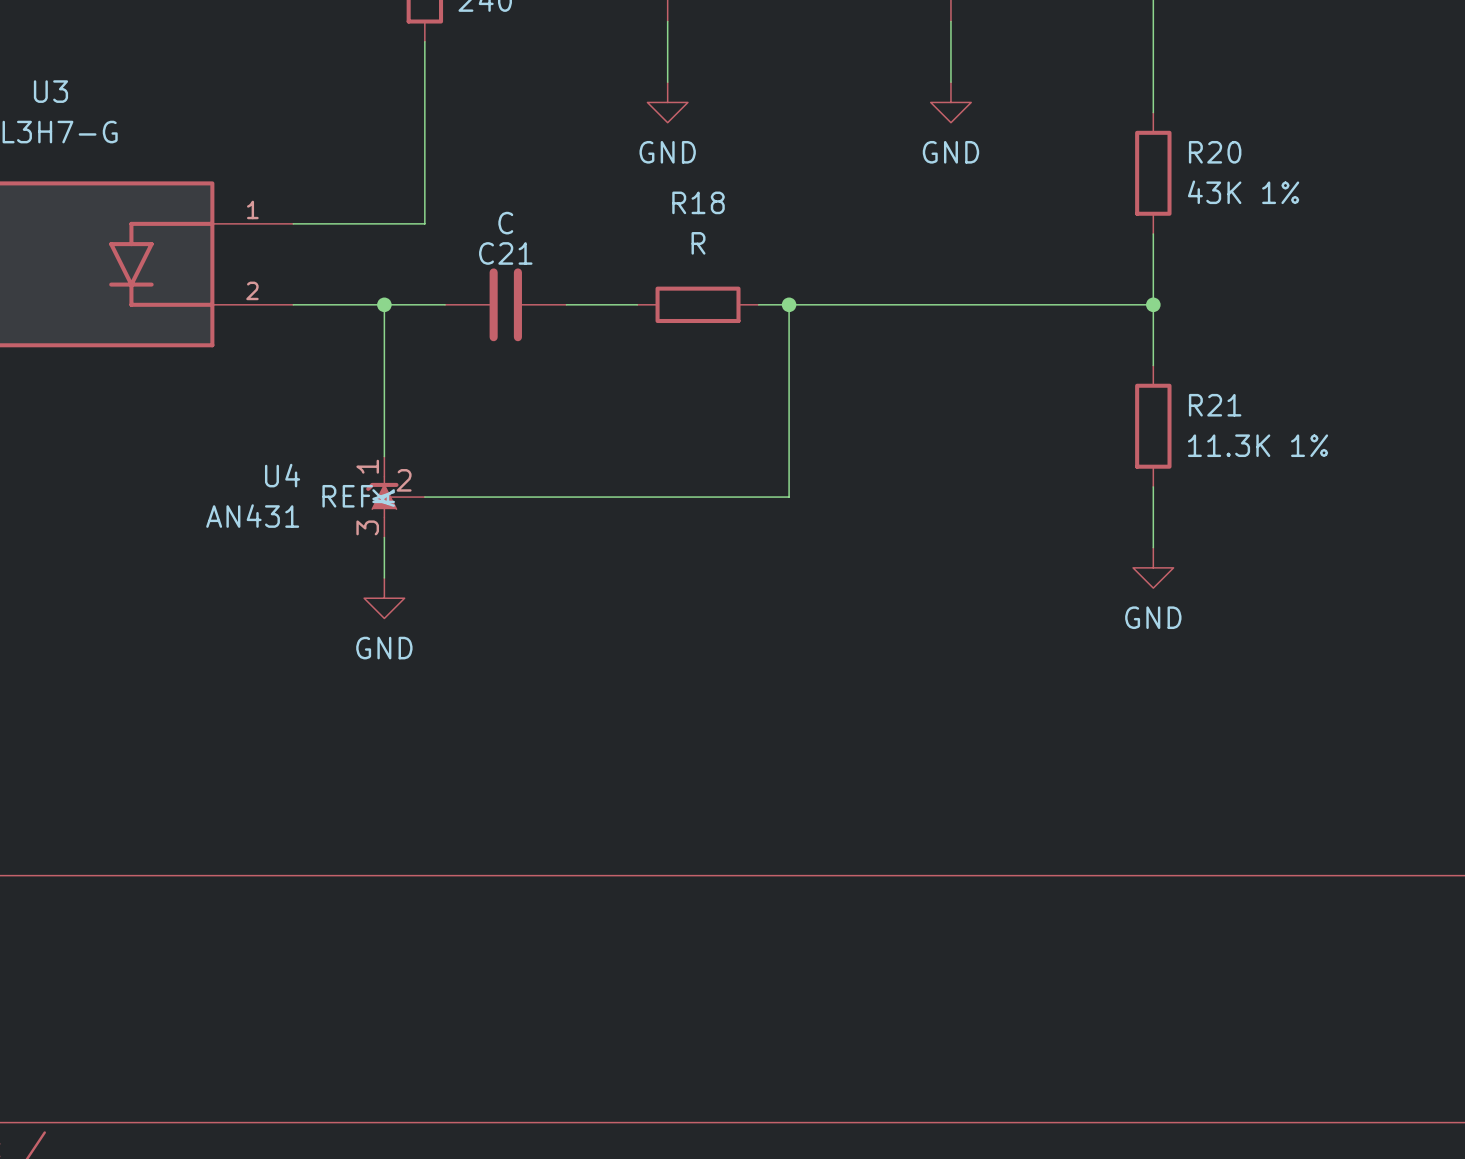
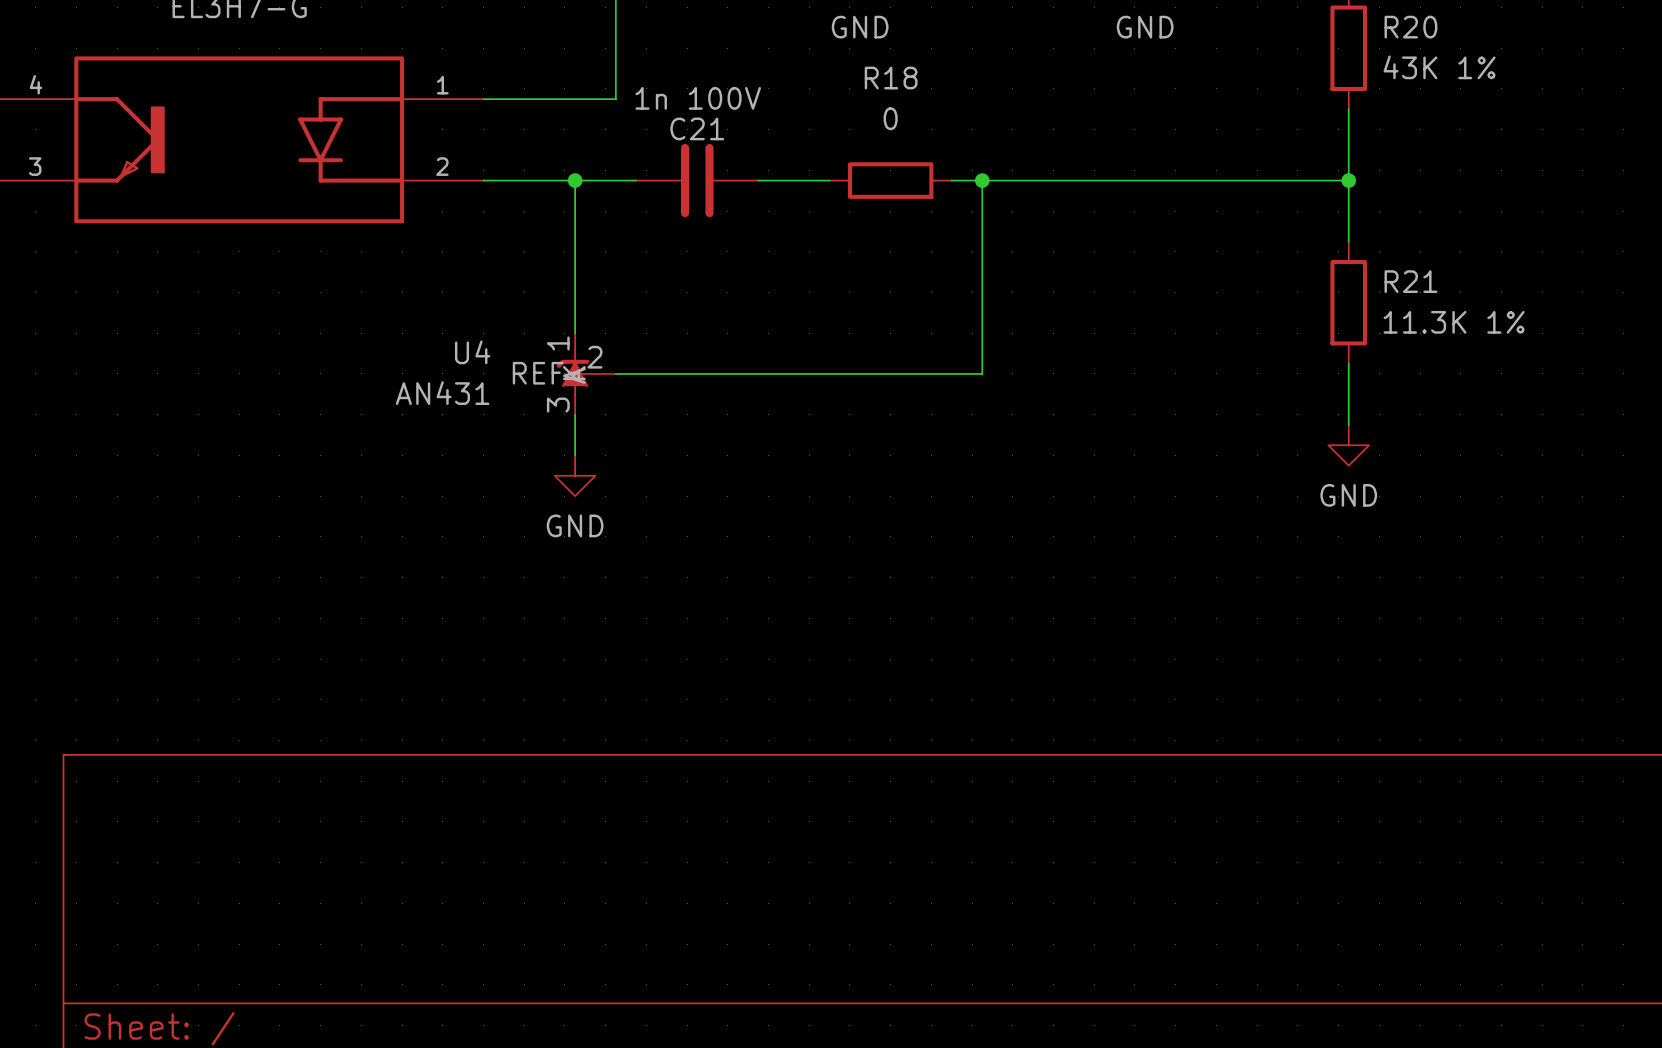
C21 value: C (505, 223) -> 1n 100V (698, 98)
R18 value: R (698, 243) -> 0 (890, 118)

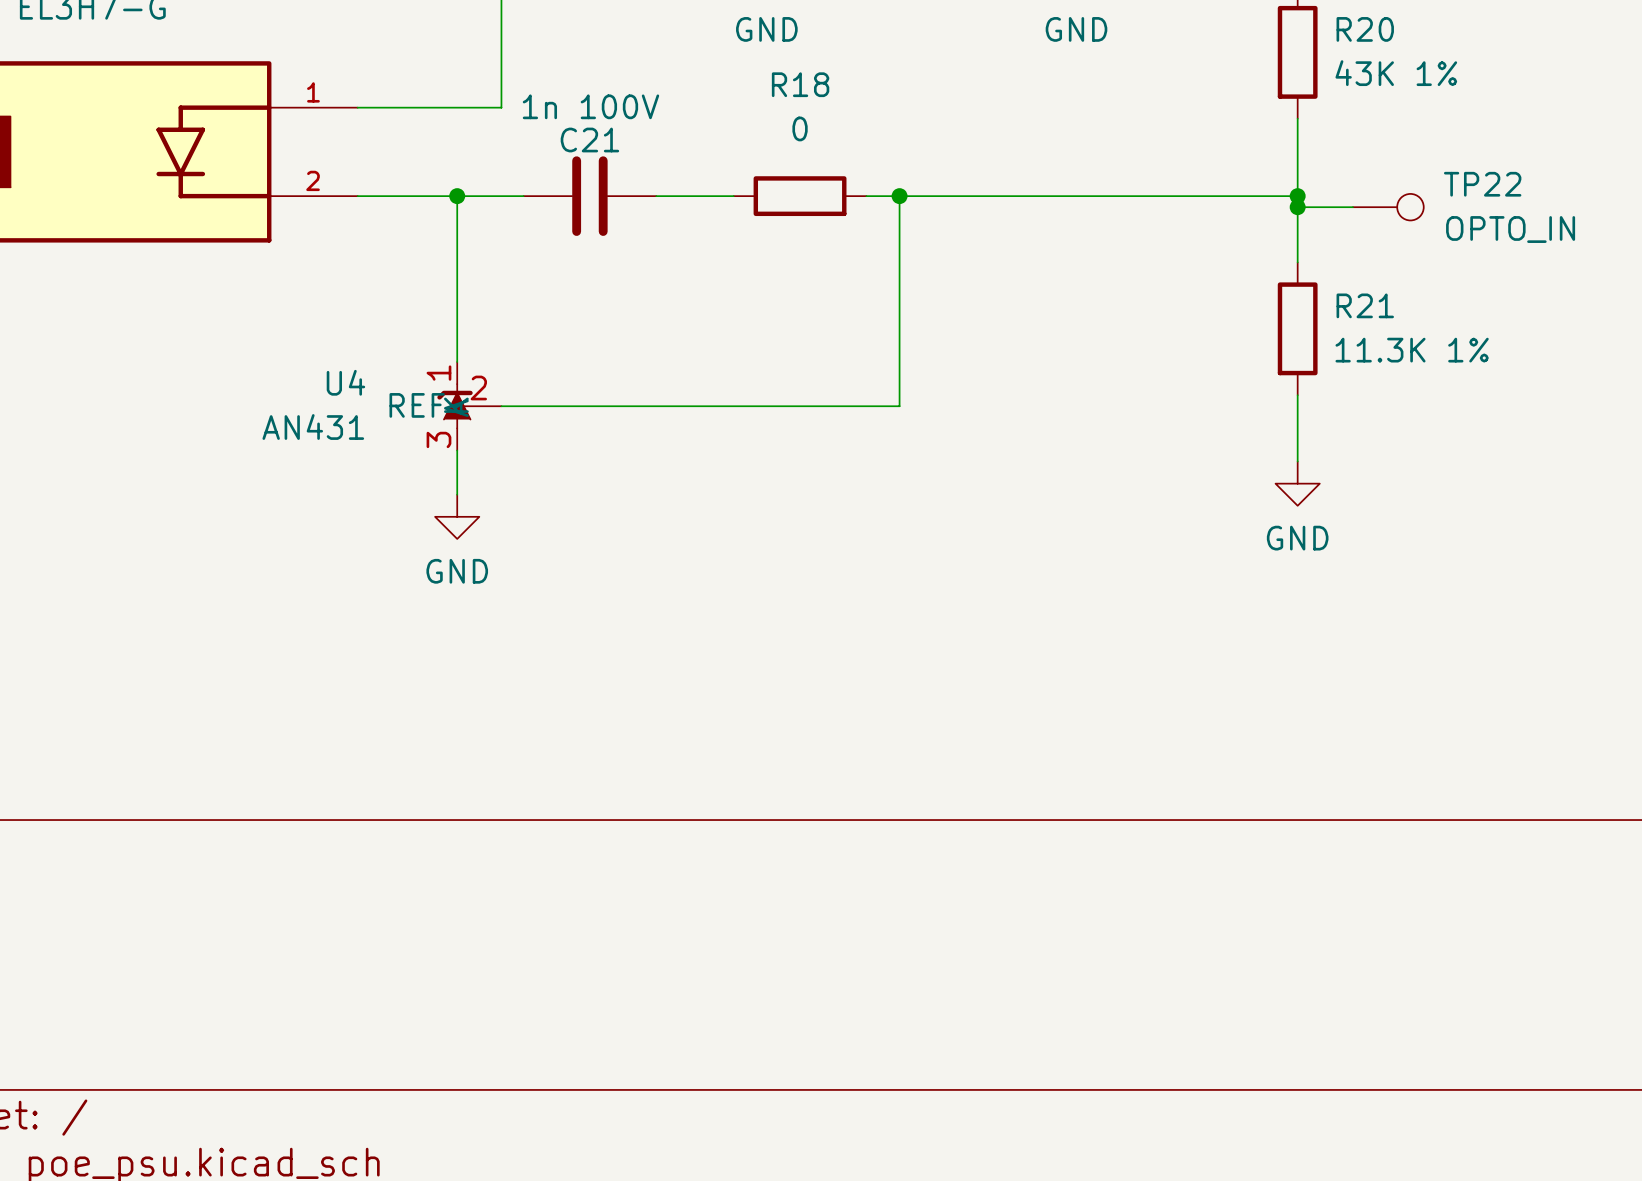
wire: none -> (1297, 207) (1352, 207)
junction: none -> (1297, 207)
TP22: none -> OPTO_IN (1388, 207)

